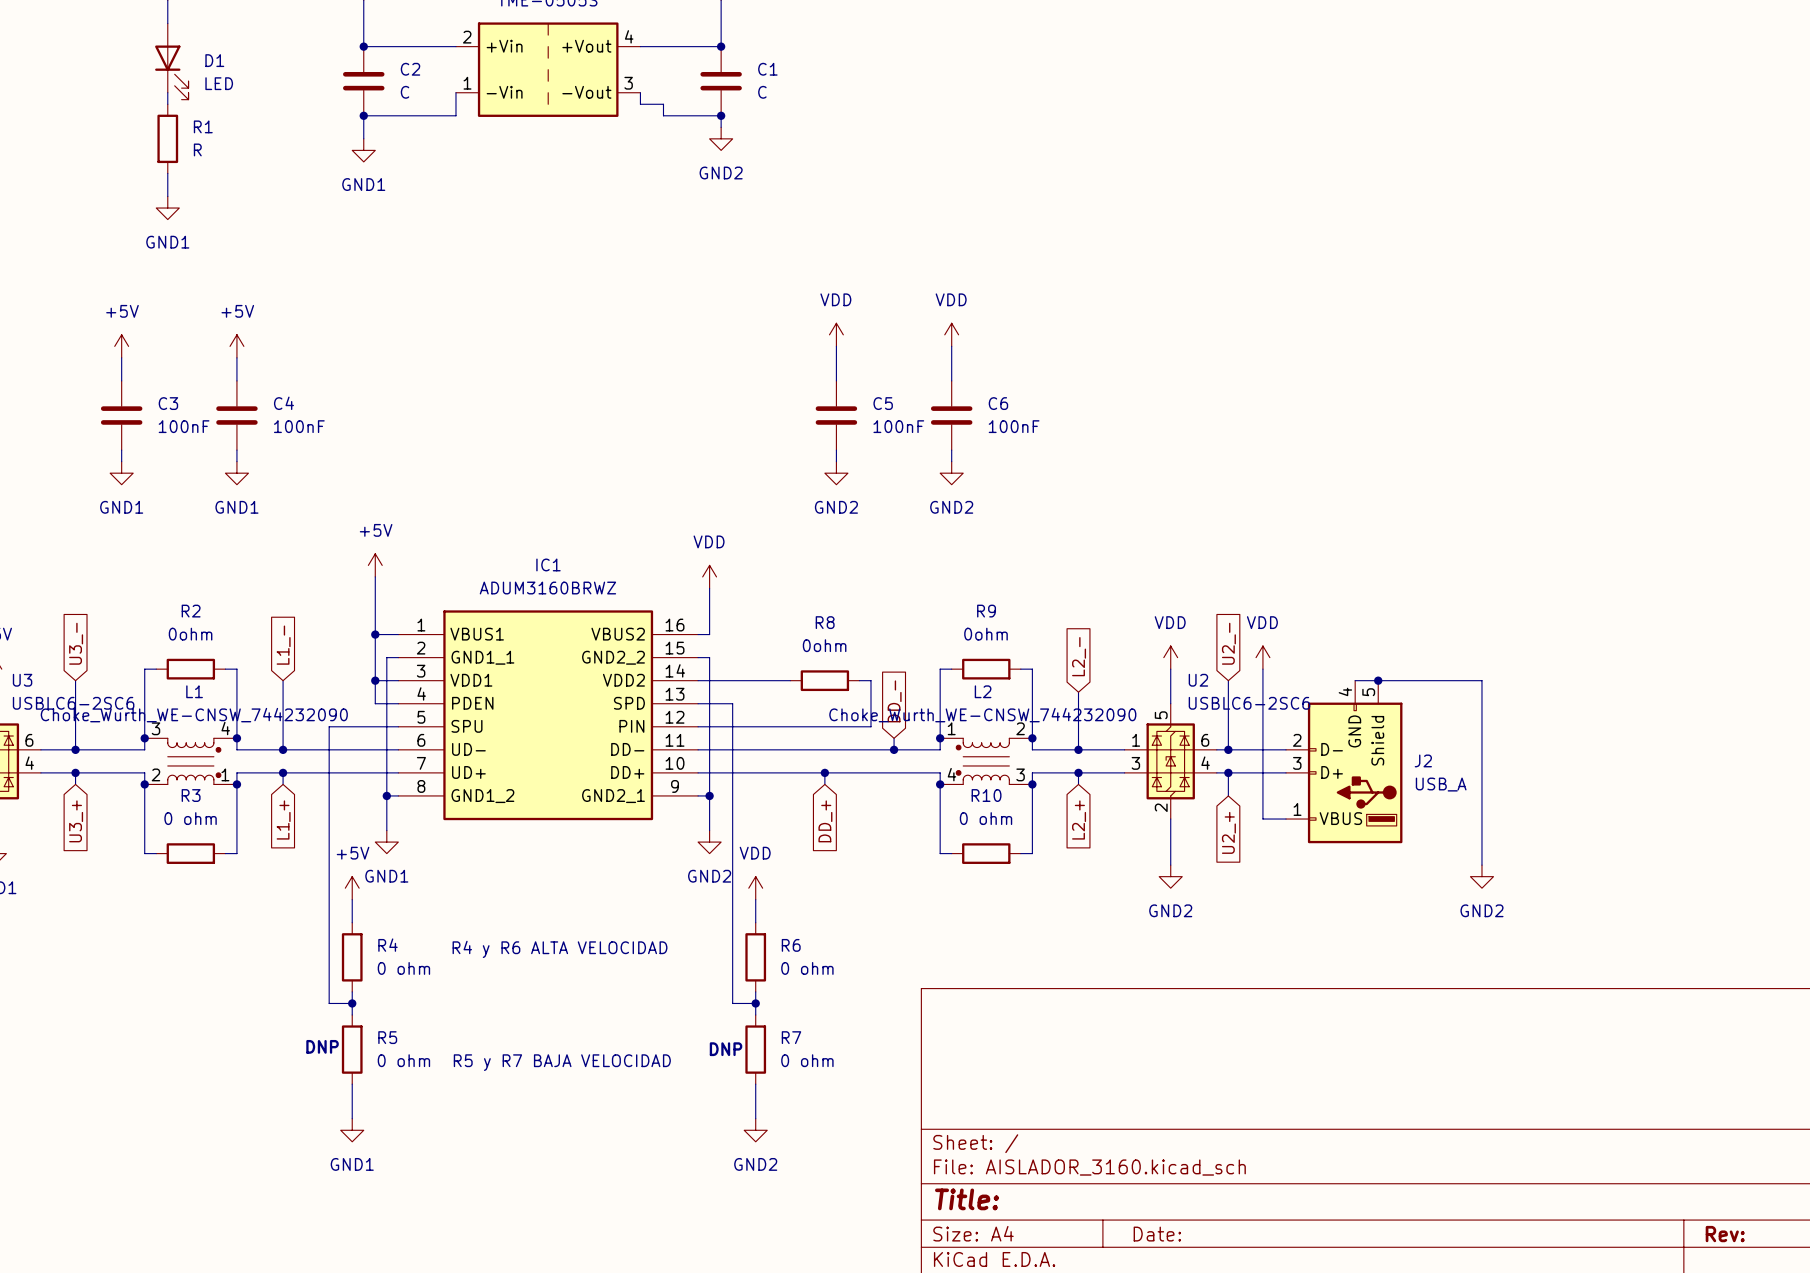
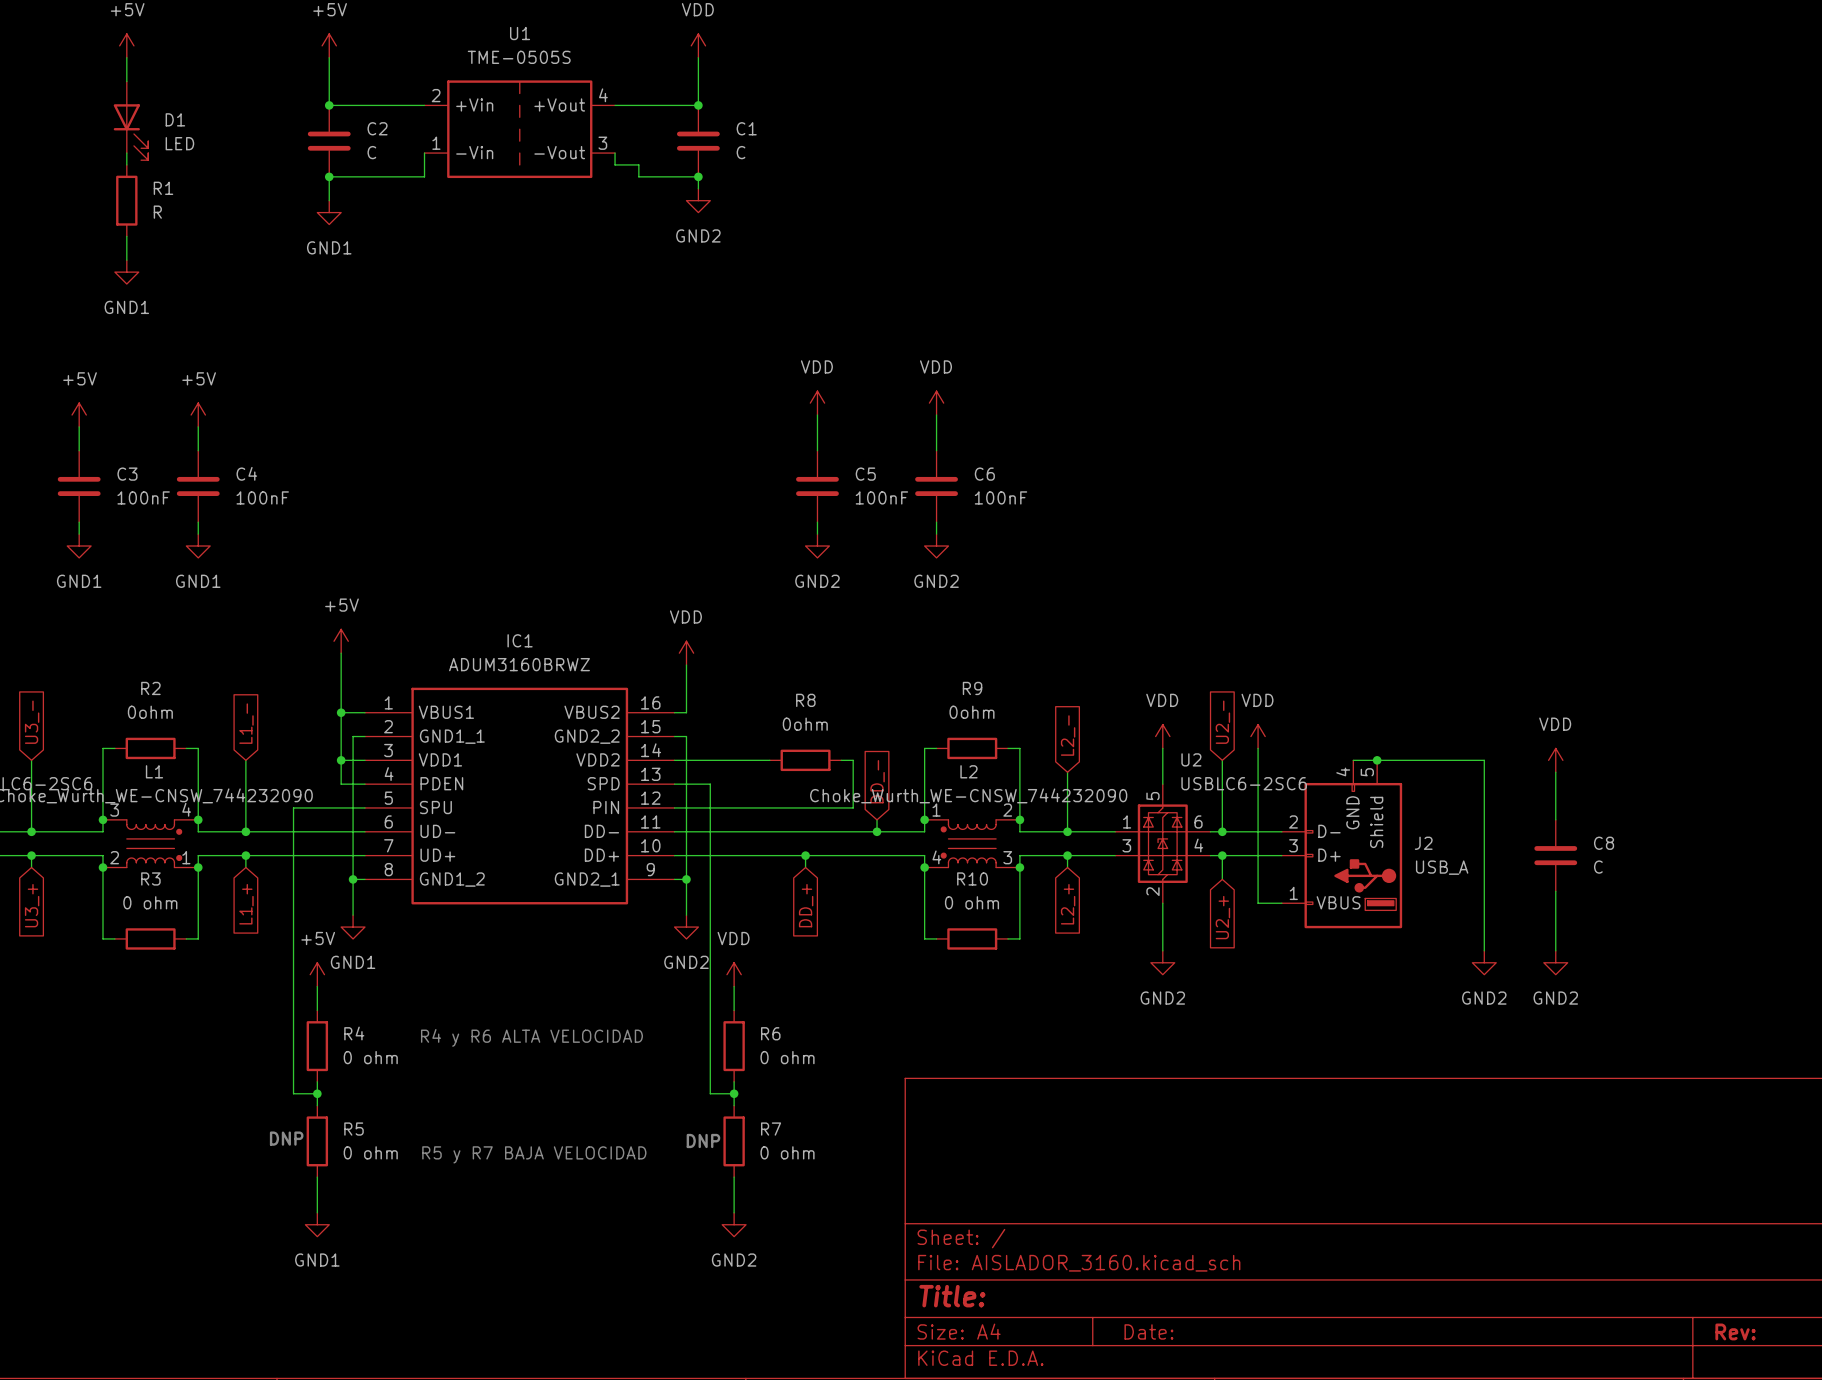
power symbol: none -> VDD (1555, 760)
wire: none -> (1555, 772) (1555, 819)
C8: none -> C (1555, 855)
wire: none -> (1555, 891) (1555, 950)
power symbol: none -> GND2 (1555, 962)

